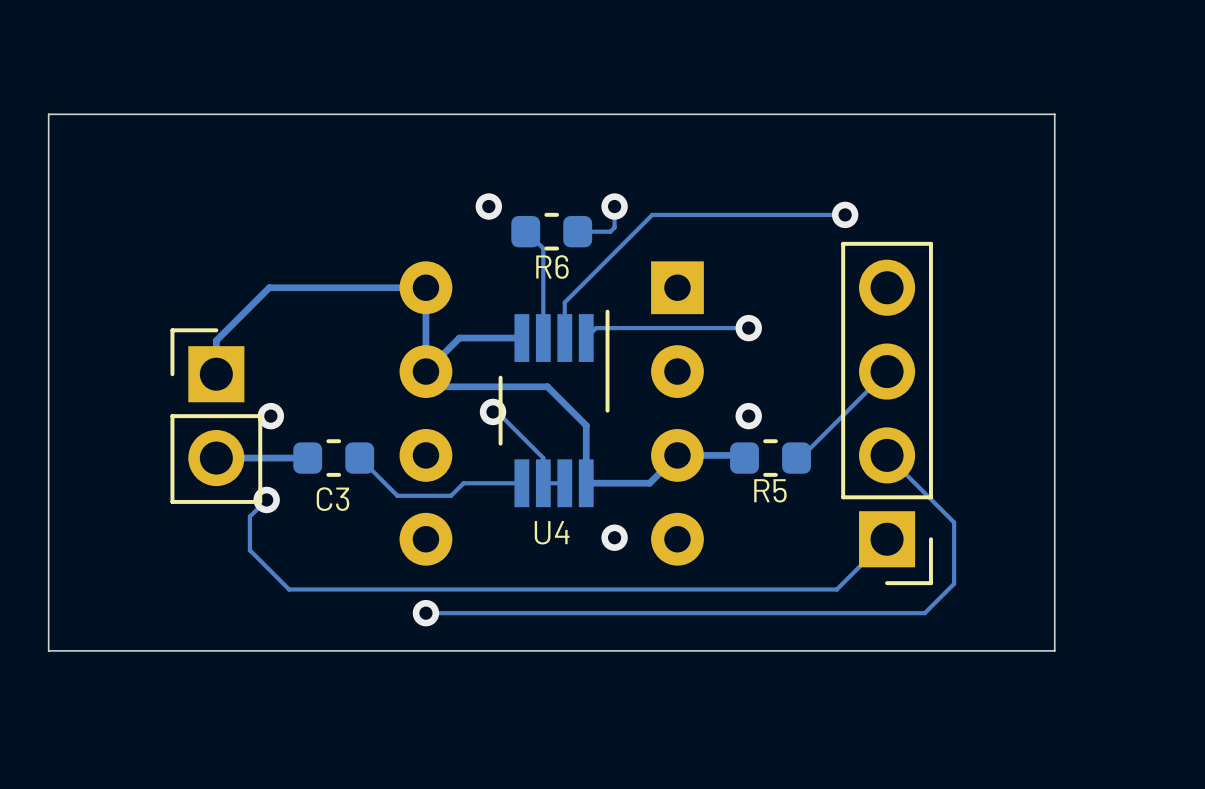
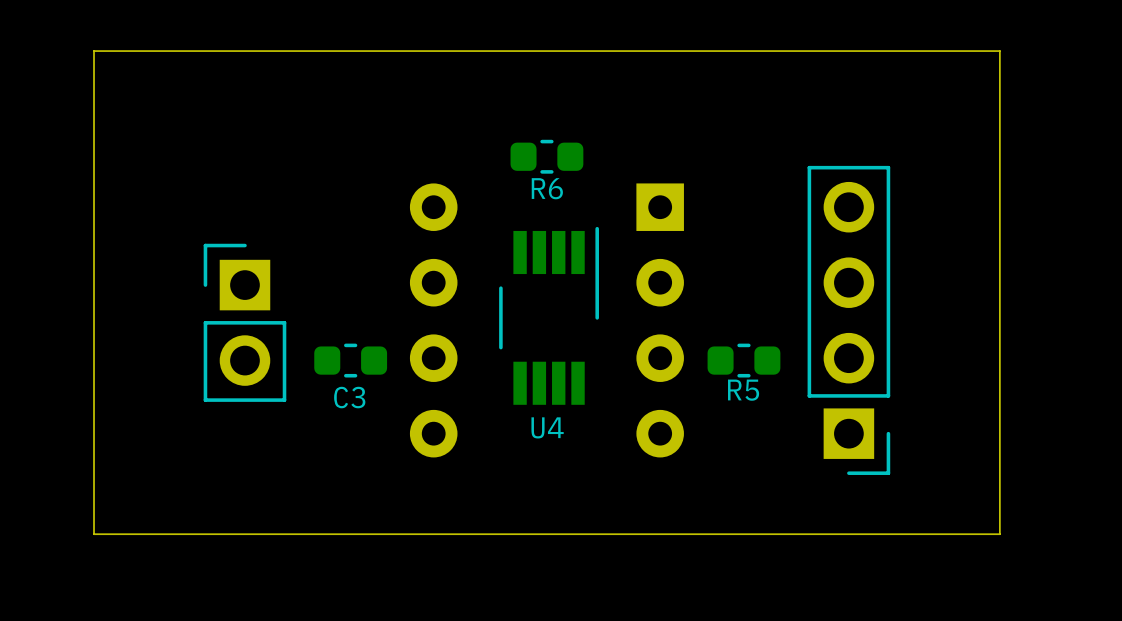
via: (488, 206) -> none
track: (614, 206) (614, 227) (610, 231) (577, 231) -> none
via: (614, 206) -> none
track: (845, 214) (652, 214) (564, 302) (564, 338) -> none
via: (845, 214) -> none
track: (525, 231) (543, 248) (543, 338) -> none
track: (748, 328) (596, 328) (586, 338) -> none
via: (748, 328) -> none
track: (521, 338) (459, 338) (425, 371) -> none
track: (425, 371) (425, 287) (269, 287) (216, 340) (216, 374) -> none
track: (425, 371) (441, 386) (547, 386) (586, 425) (586, 483) (649, 483) (677, 455) (741, 455) (744, 458) -> none
track: (887, 371) (800, 458) (796, 458) -> none
via: (493, 411) -> none
track: (497, 411) (543, 458) (543, 483) (564, 483) -> none
via: (270, 416) -> none
via: (748, 416) -> none
track: (887, 455) (954, 522) (954, 583) (924, 613) (425, 613) -> none
track: (307, 458) (216, 458) -> none
track: (359, 458) (397, 495) (451, 495) (463, 483) (521, 483) -> none
track: (266, 499) (249, 516) (249, 550) (289, 589) (836, 589) (887, 539) -> none
via: (266, 499) -> none
via: (614, 537) -> none
via: (425, 613) -> none

